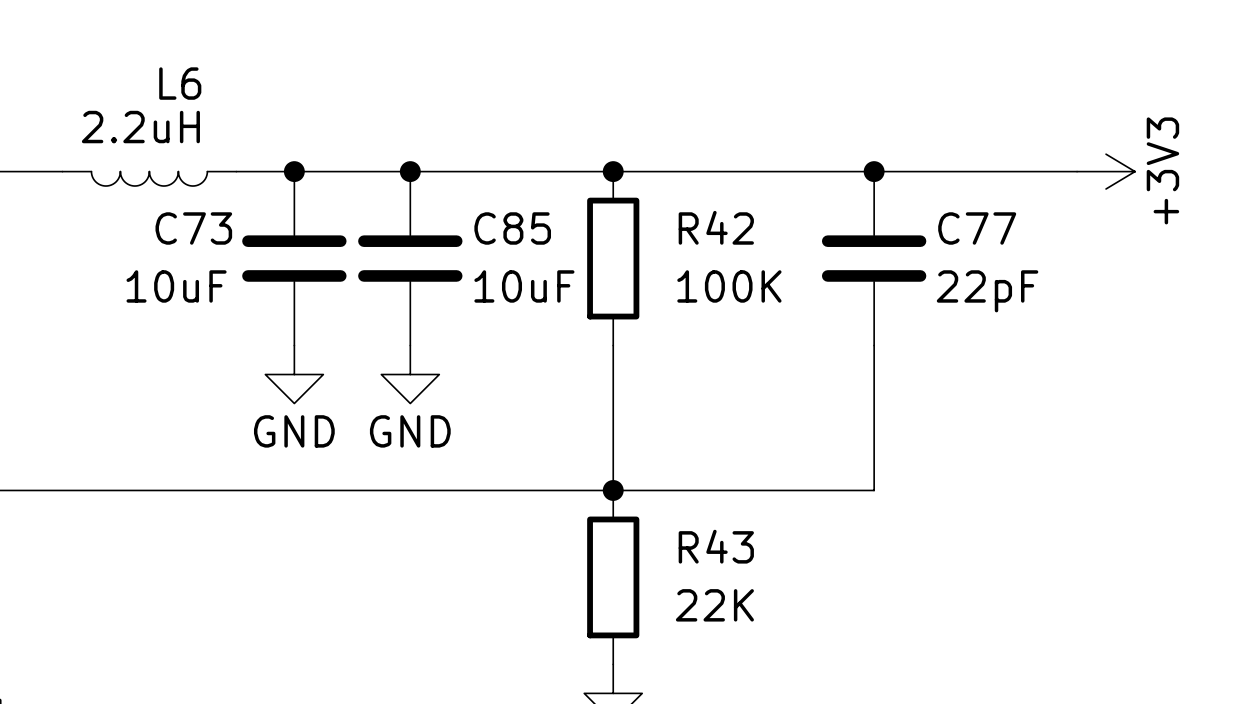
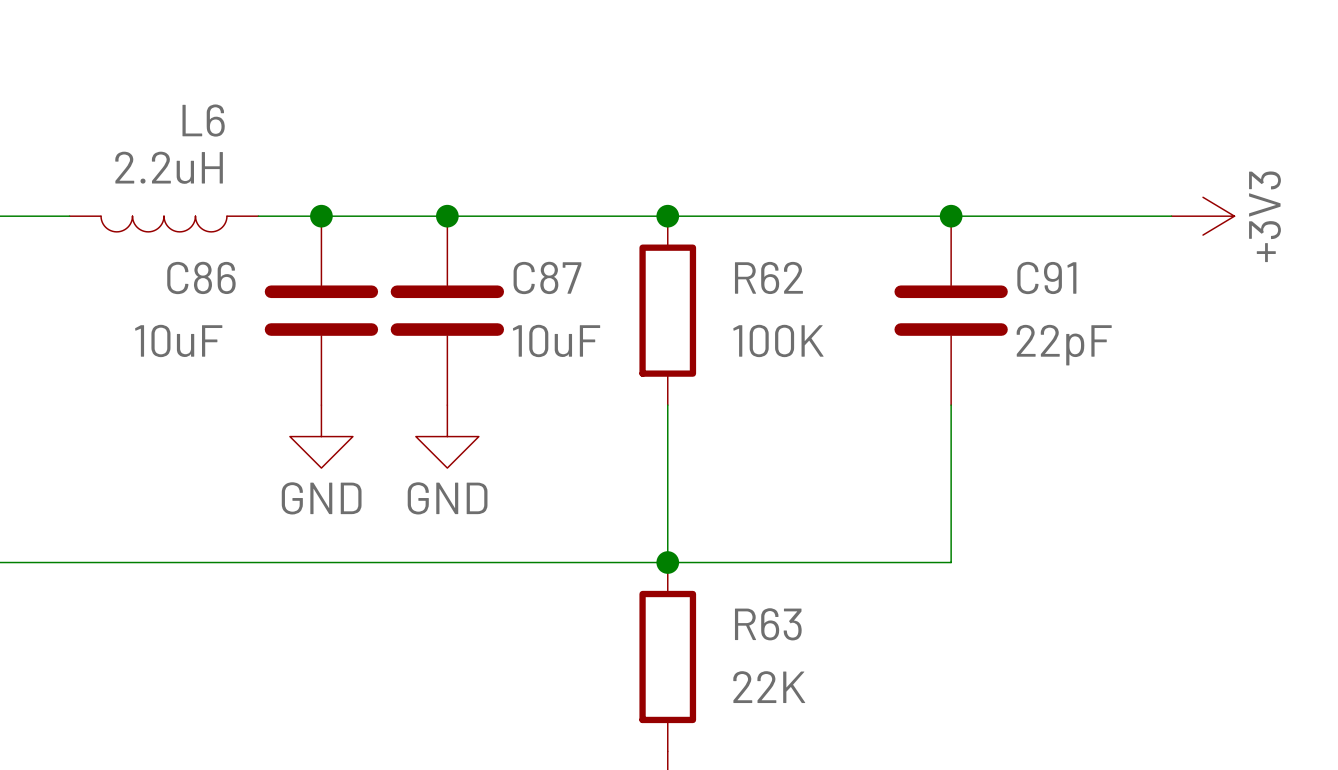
R42 name: R42 (716, 227) -> R62 (768, 277)
C73 name: C73 (193, 228) -> C86 (201, 277)
C85 name: C85 (512, 228) -> C87 (547, 277)
C77 name: C77 (977, 228) -> C91 (1046, 278)
R43 name: R43 (716, 546) -> R63 (768, 624)

